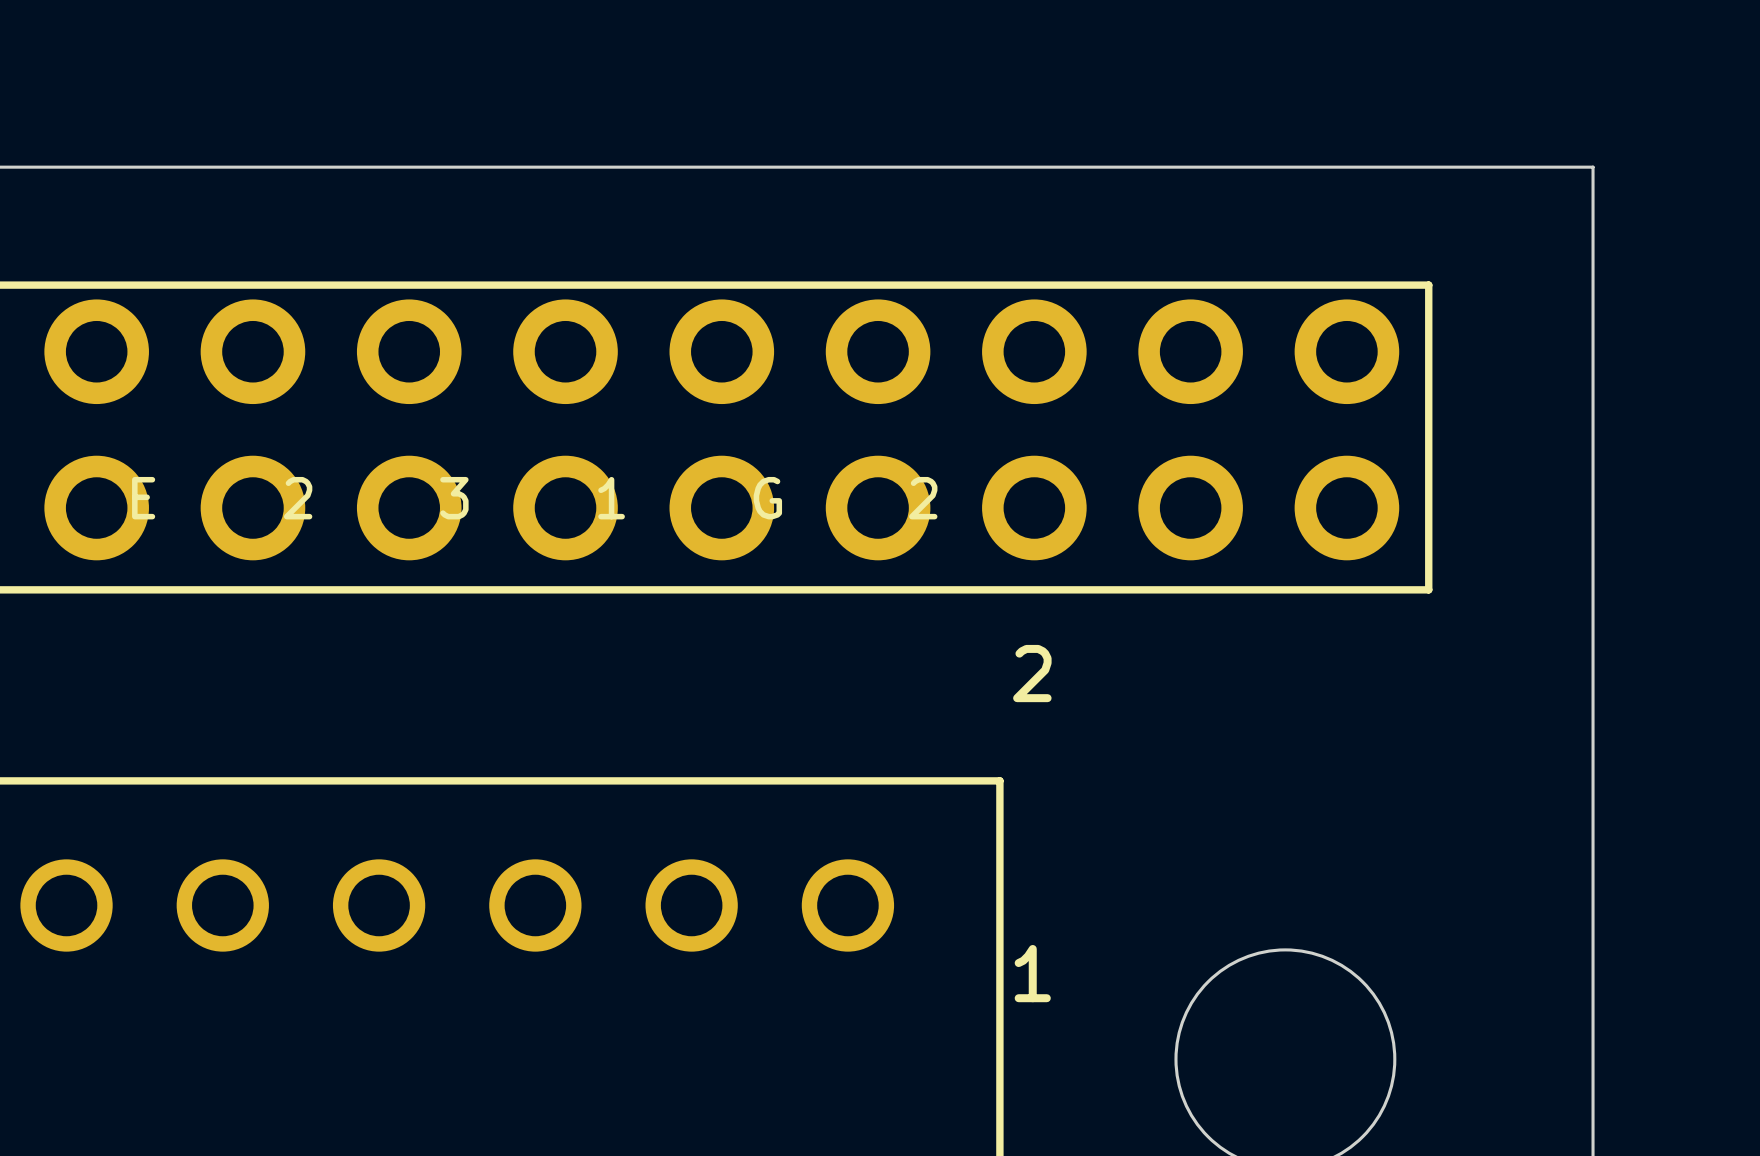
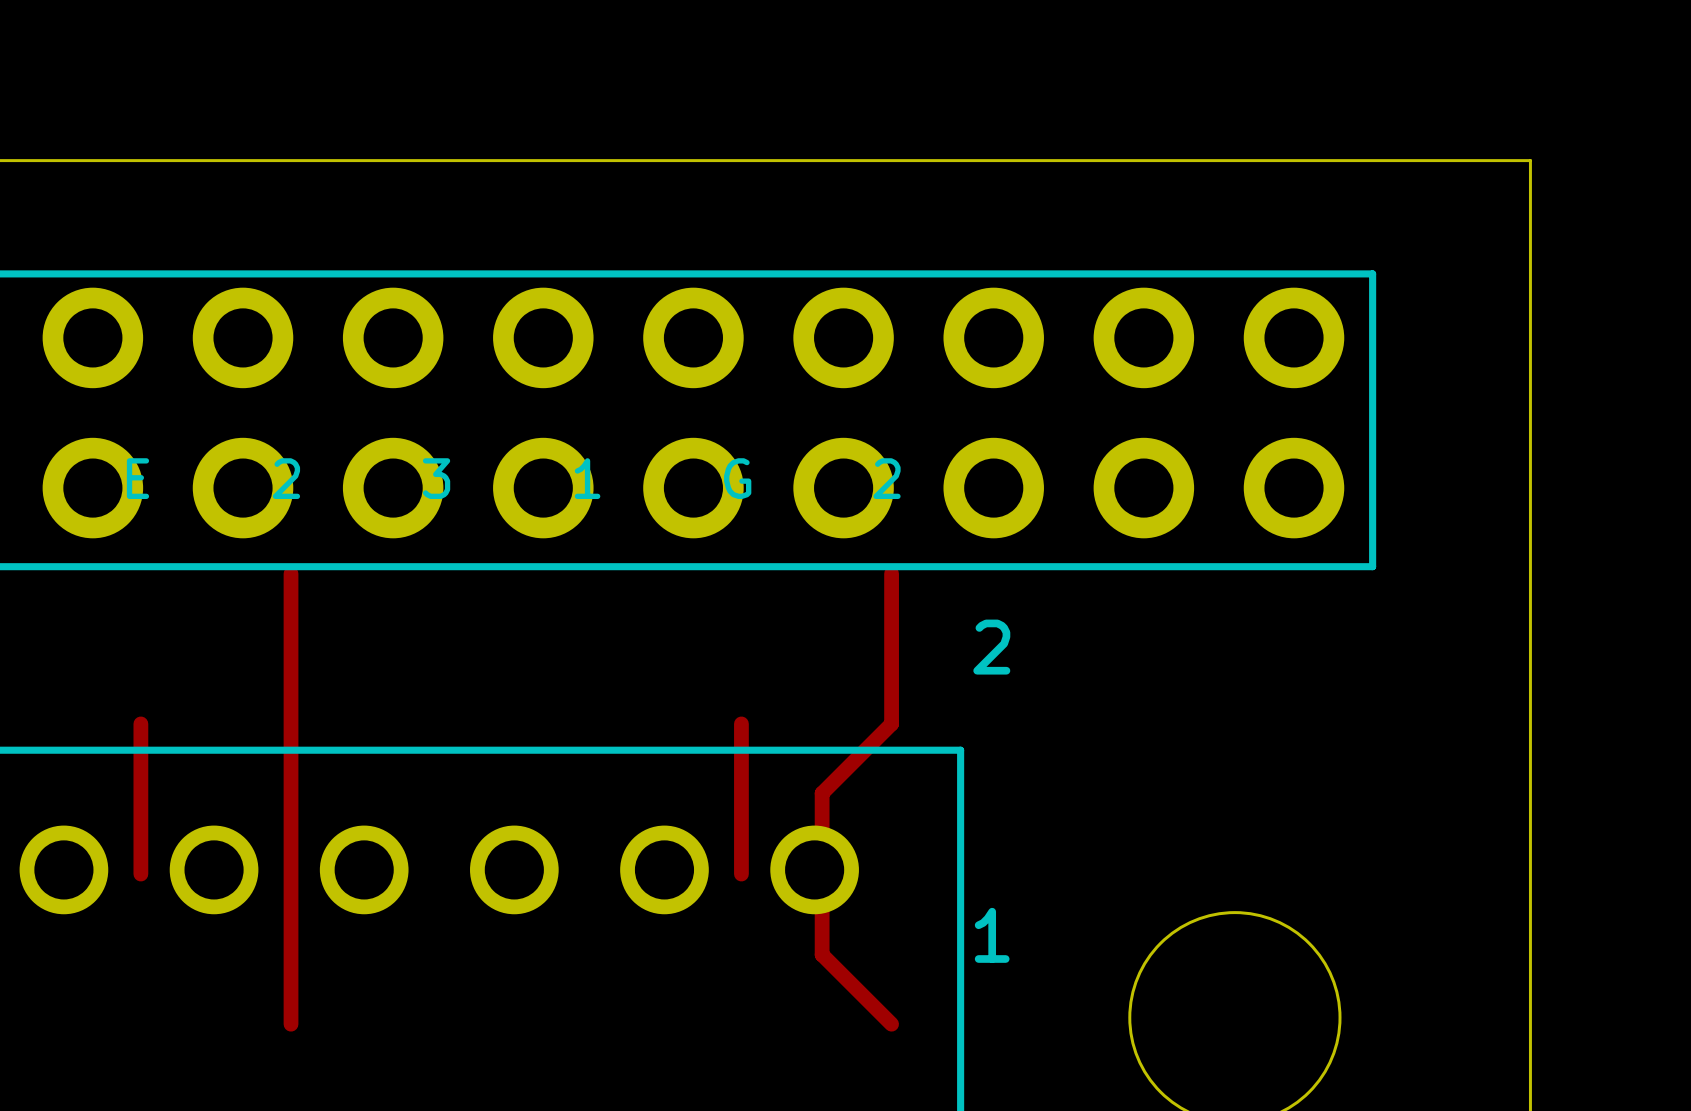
track: none -> (291, 573) (291, 1024)
track: none -> (891, 573) (891, 723) (822, 793) (822, 954) (891, 1024)
track: none -> (140, 723) (140, 874)
track: none -> (741, 723) (741, 874)

